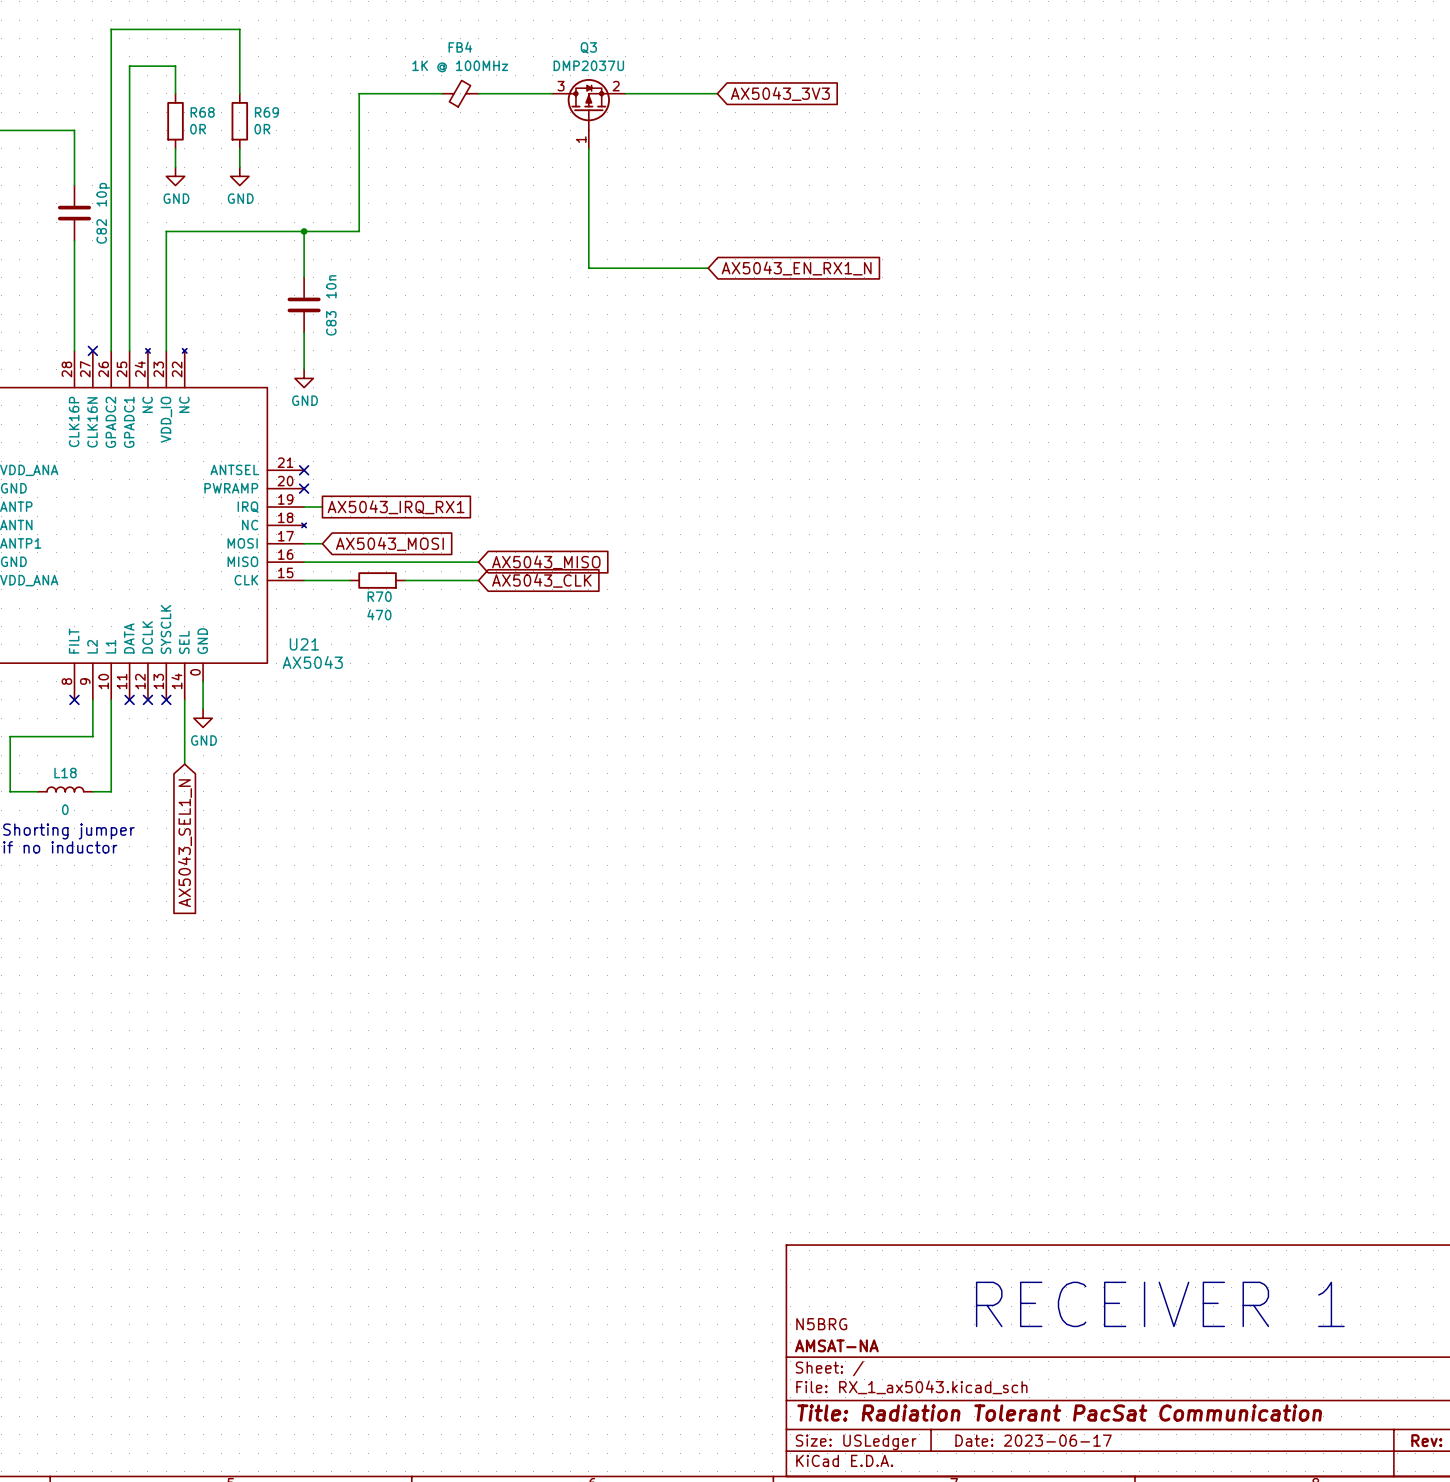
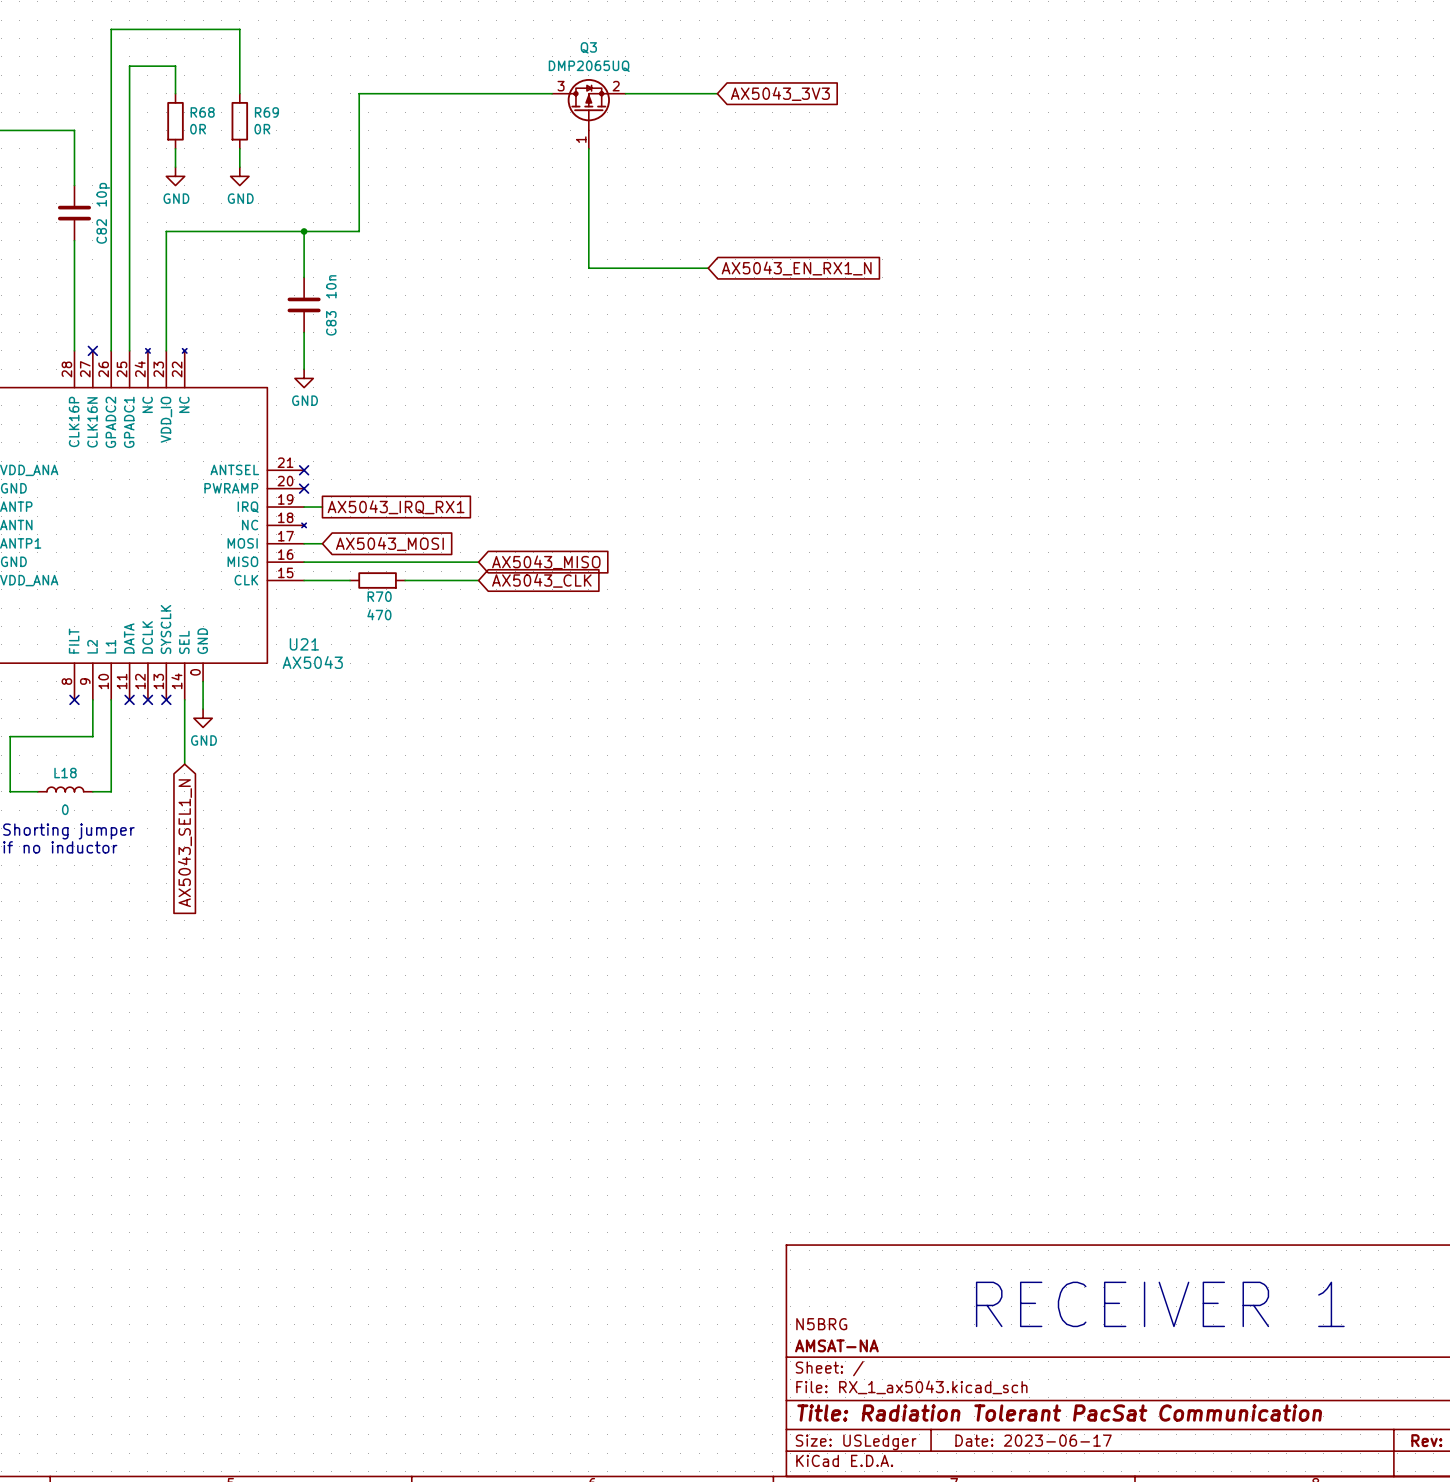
Q3 value: DMP2037U (588, 65) -> DMP2065UQ (589, 66)
FB4: 1K @ 100MHz (460, 93) -> none

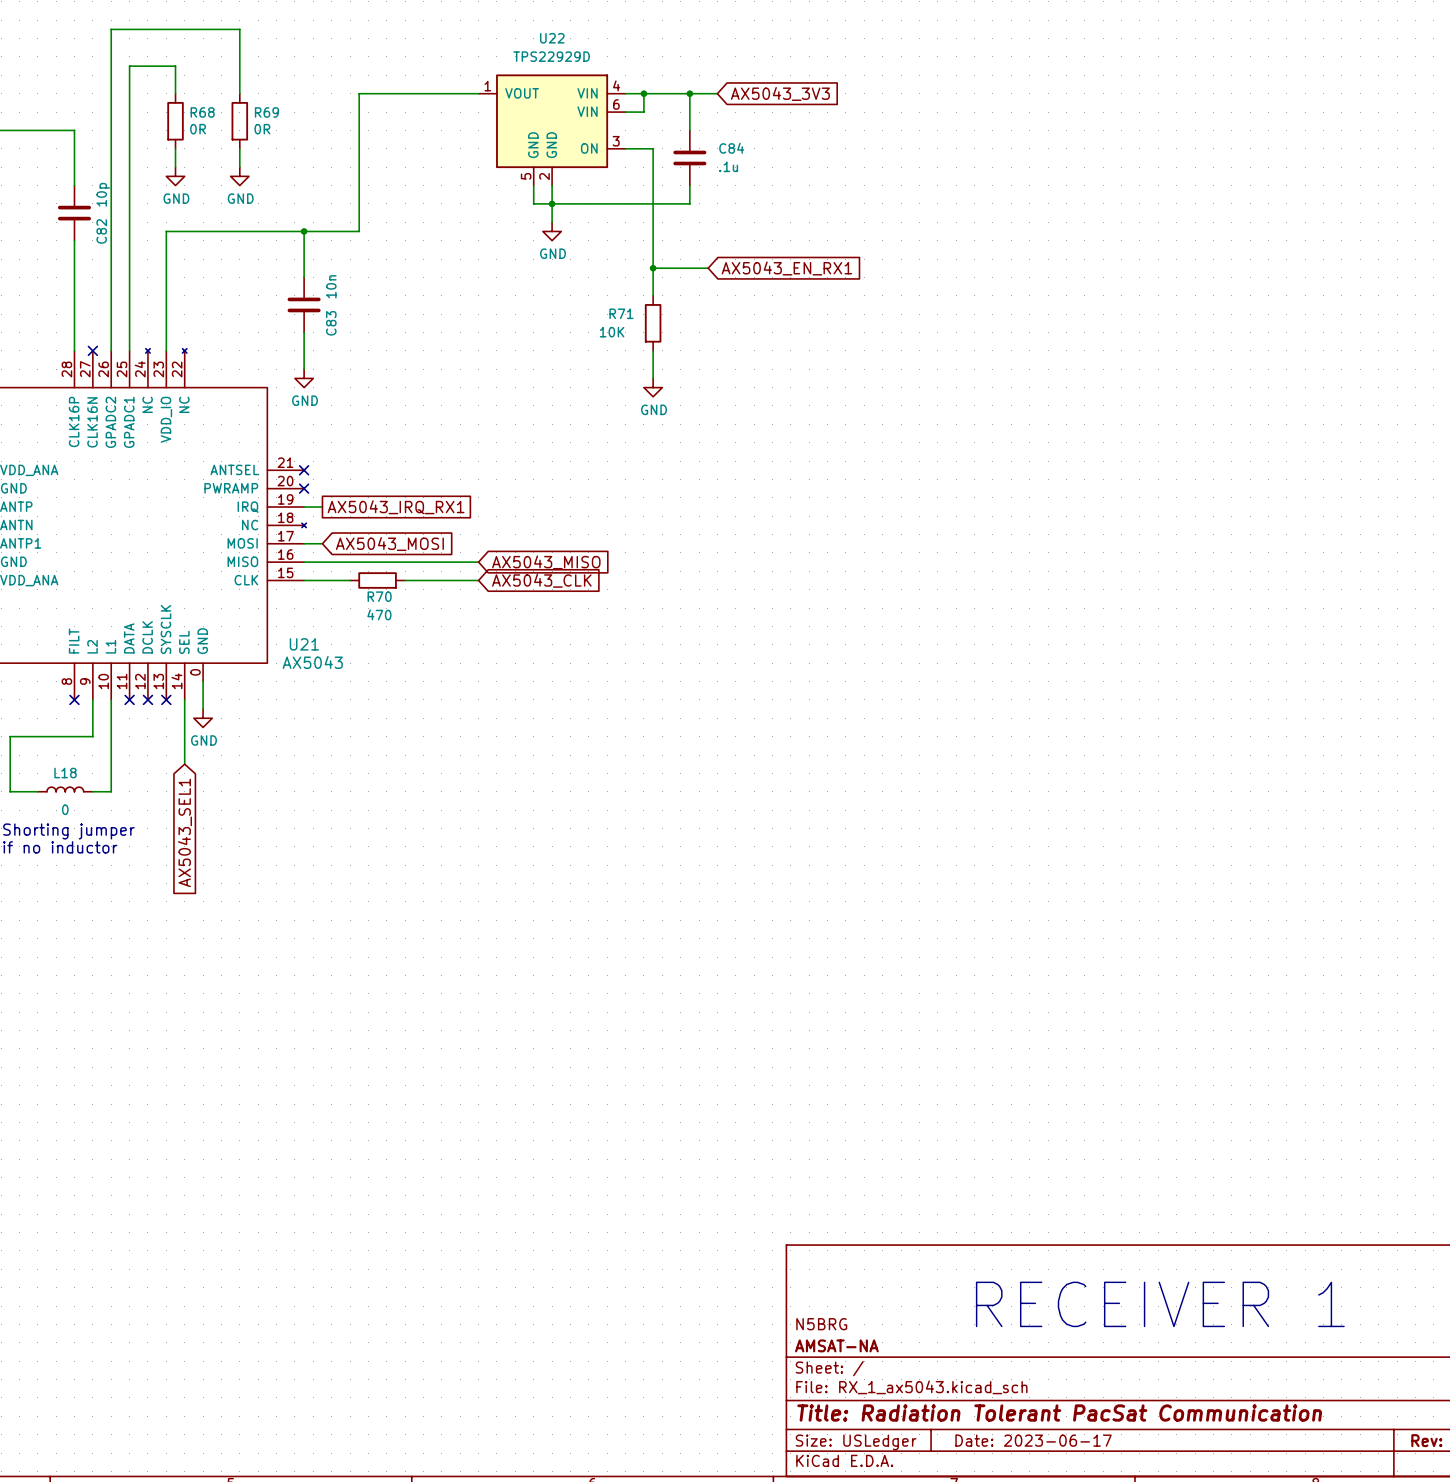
wire: none -> (643, 93) (643, 112) (625, 112)
junction: none -> (643, 93)
wire: none -> (689, 93) (689, 130)
junction: none -> (689, 93)
Q3: DMP2065UQ (588, 113) -> none
U22: none -> TPS22929D (552, 129)
wire: (588, 148) (588, 268) (653, 268) -> none
wire: none -> (625, 148) (653, 148) (653, 295)
C84: none -> .1u (689, 158)
wire: none -> (533, 185) (533, 203) (689, 203) (689, 185)
wire: none -> (552, 185) (552, 222)
junction: none -> (552, 203)
power symbol: none -> GND (552, 231)
junction: none -> (653, 268)
global label: AX5043_EN_RX1_N (796, 268) -> AX5043_EN_RX1 (786, 268)
R71: none -> 10K (653, 323)
wire: none -> (653, 350) (653, 378)
power symbol: none -> GND (653, 387)
global label: AX5043_SEL1_N (184, 843) -> AX5043_SEL1 (184, 832)

